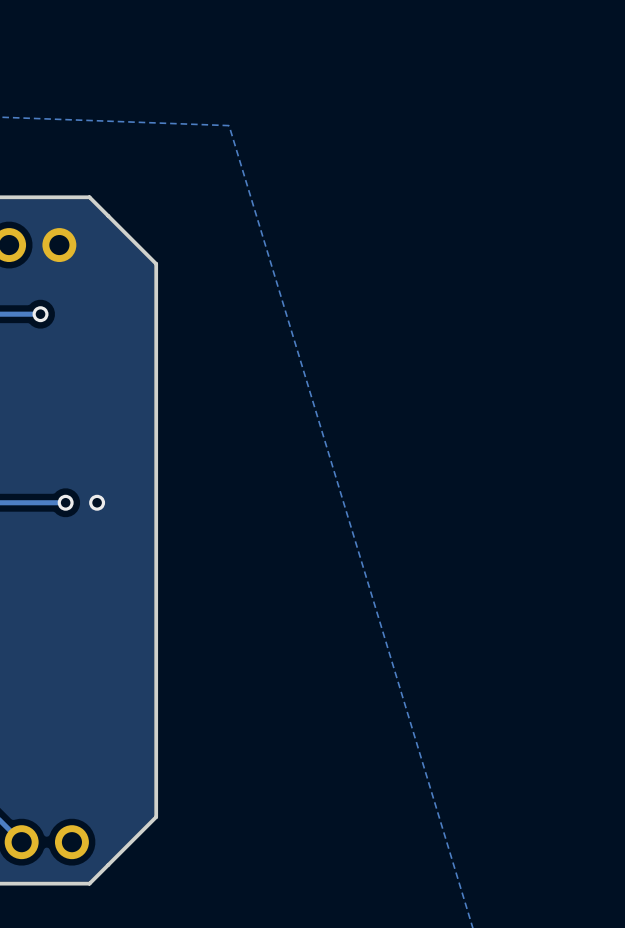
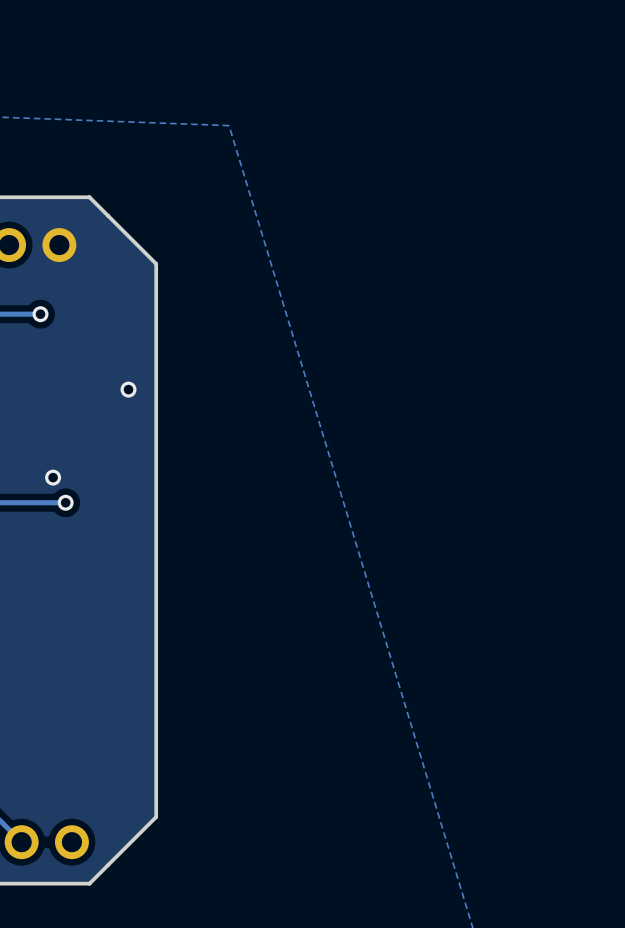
via: none -> (128, 389)
via: none -> (53, 477)
via: (97, 502) -> none

